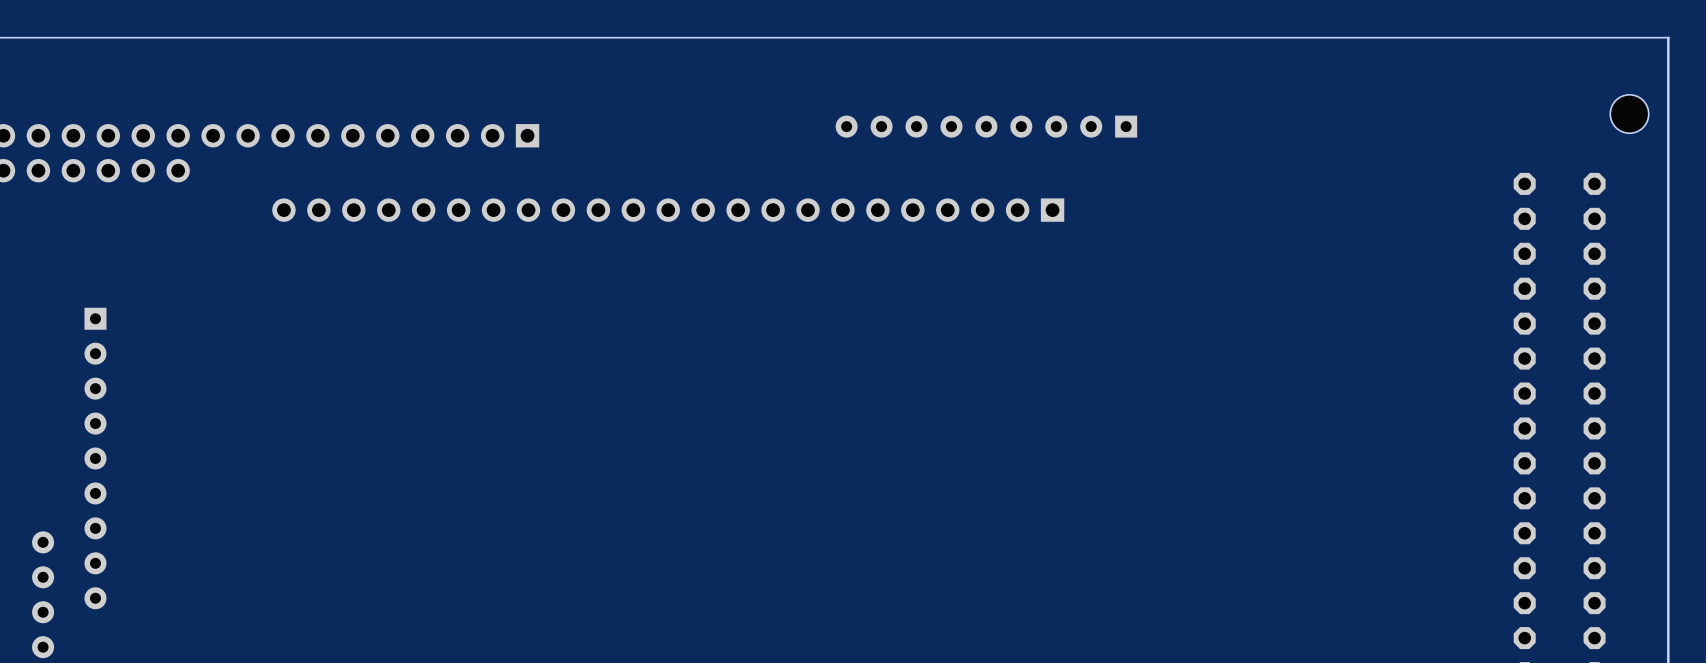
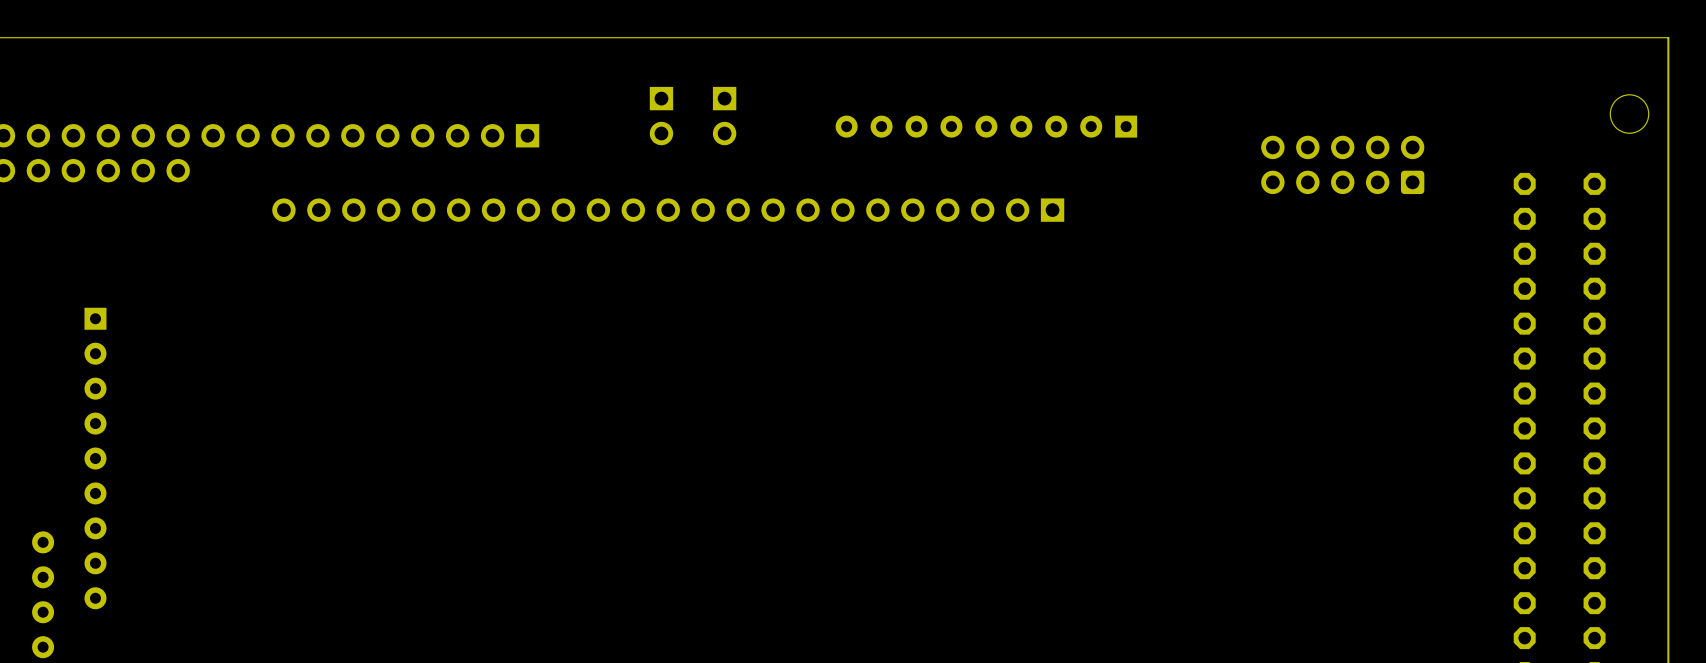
part: none -> (661, 116)
part: none -> (724, 116)
part: none -> (1342, 164)

